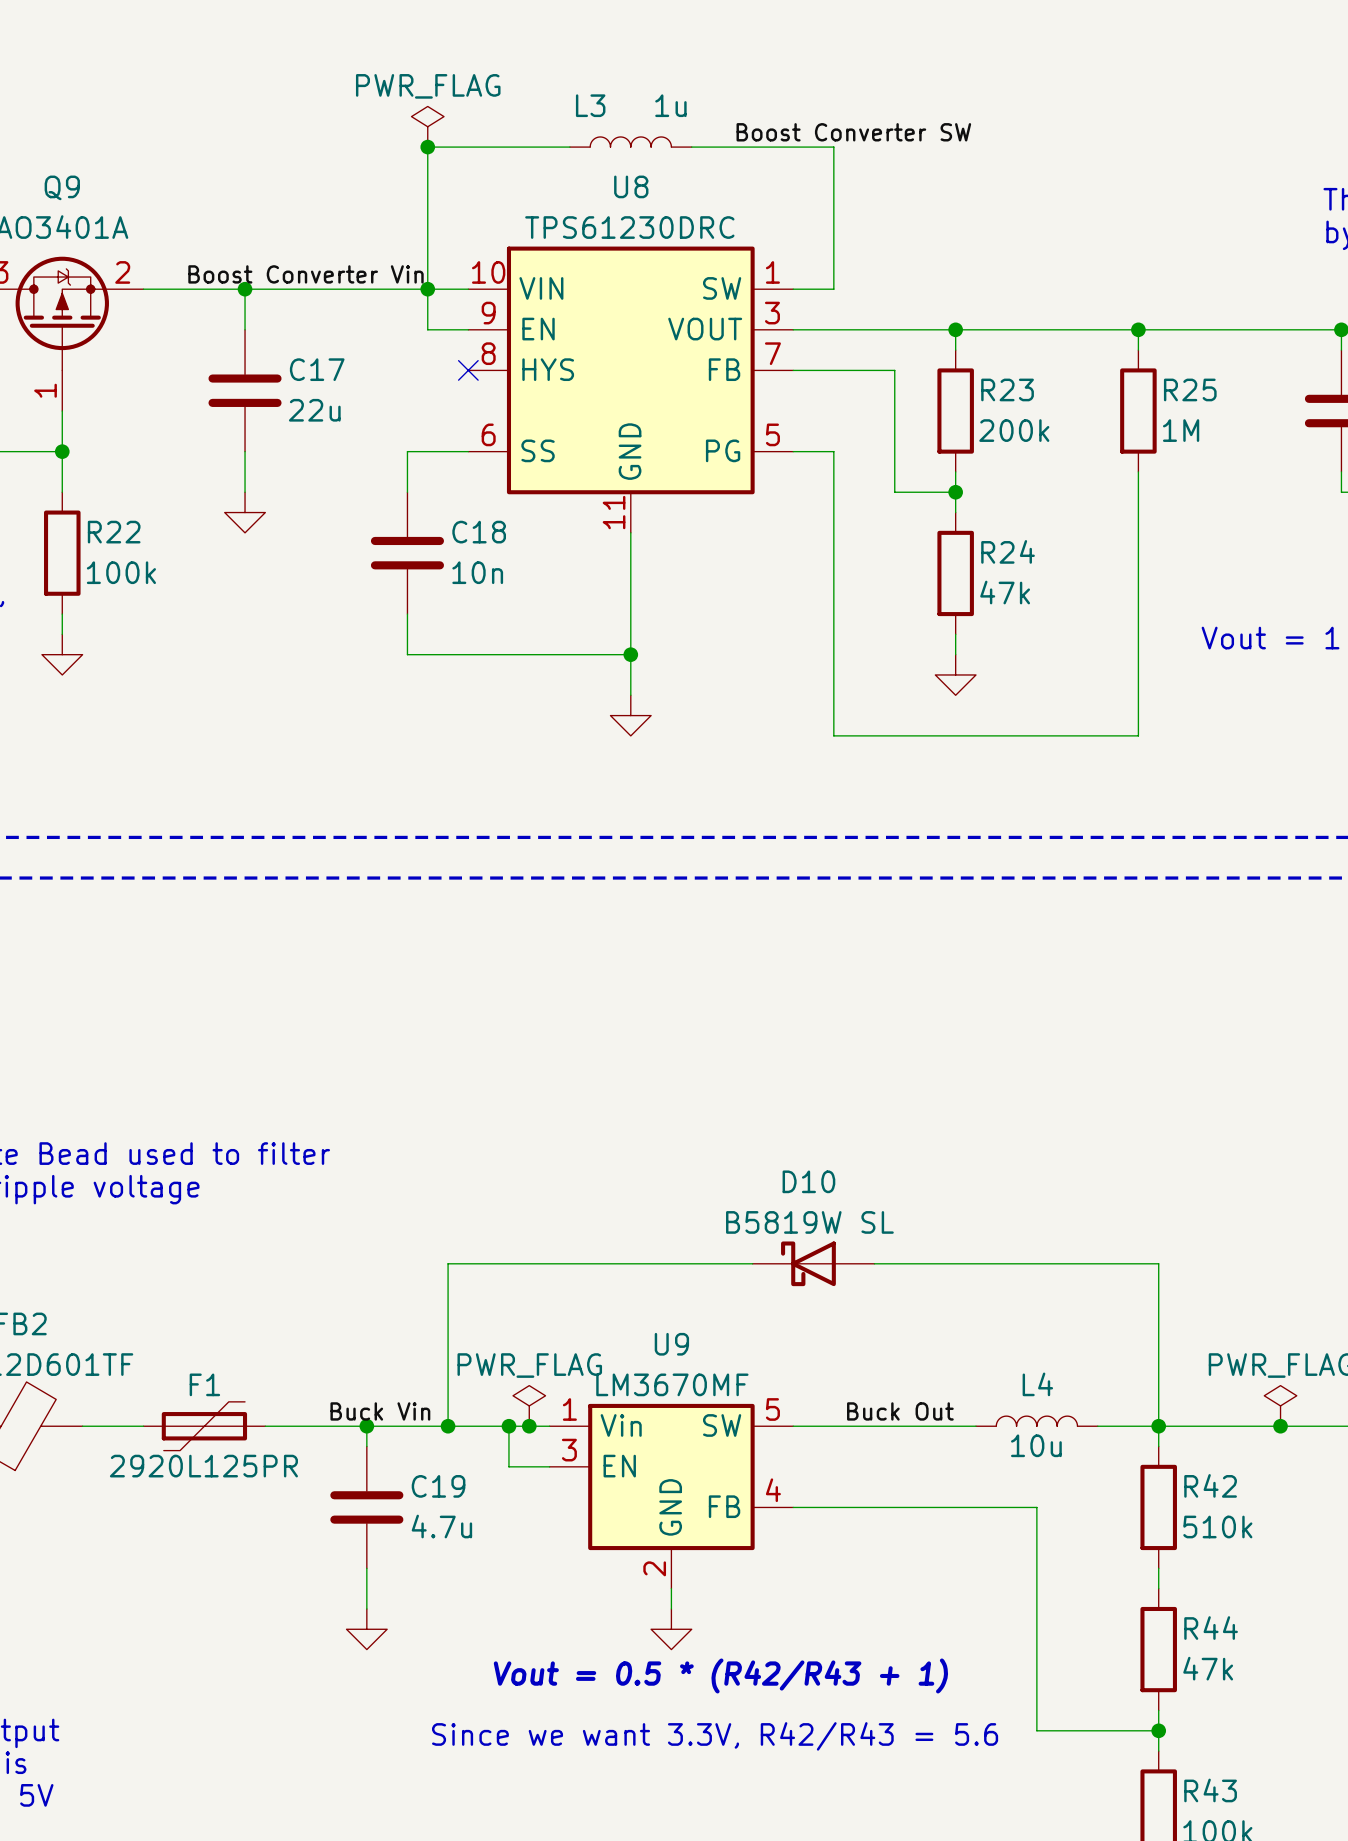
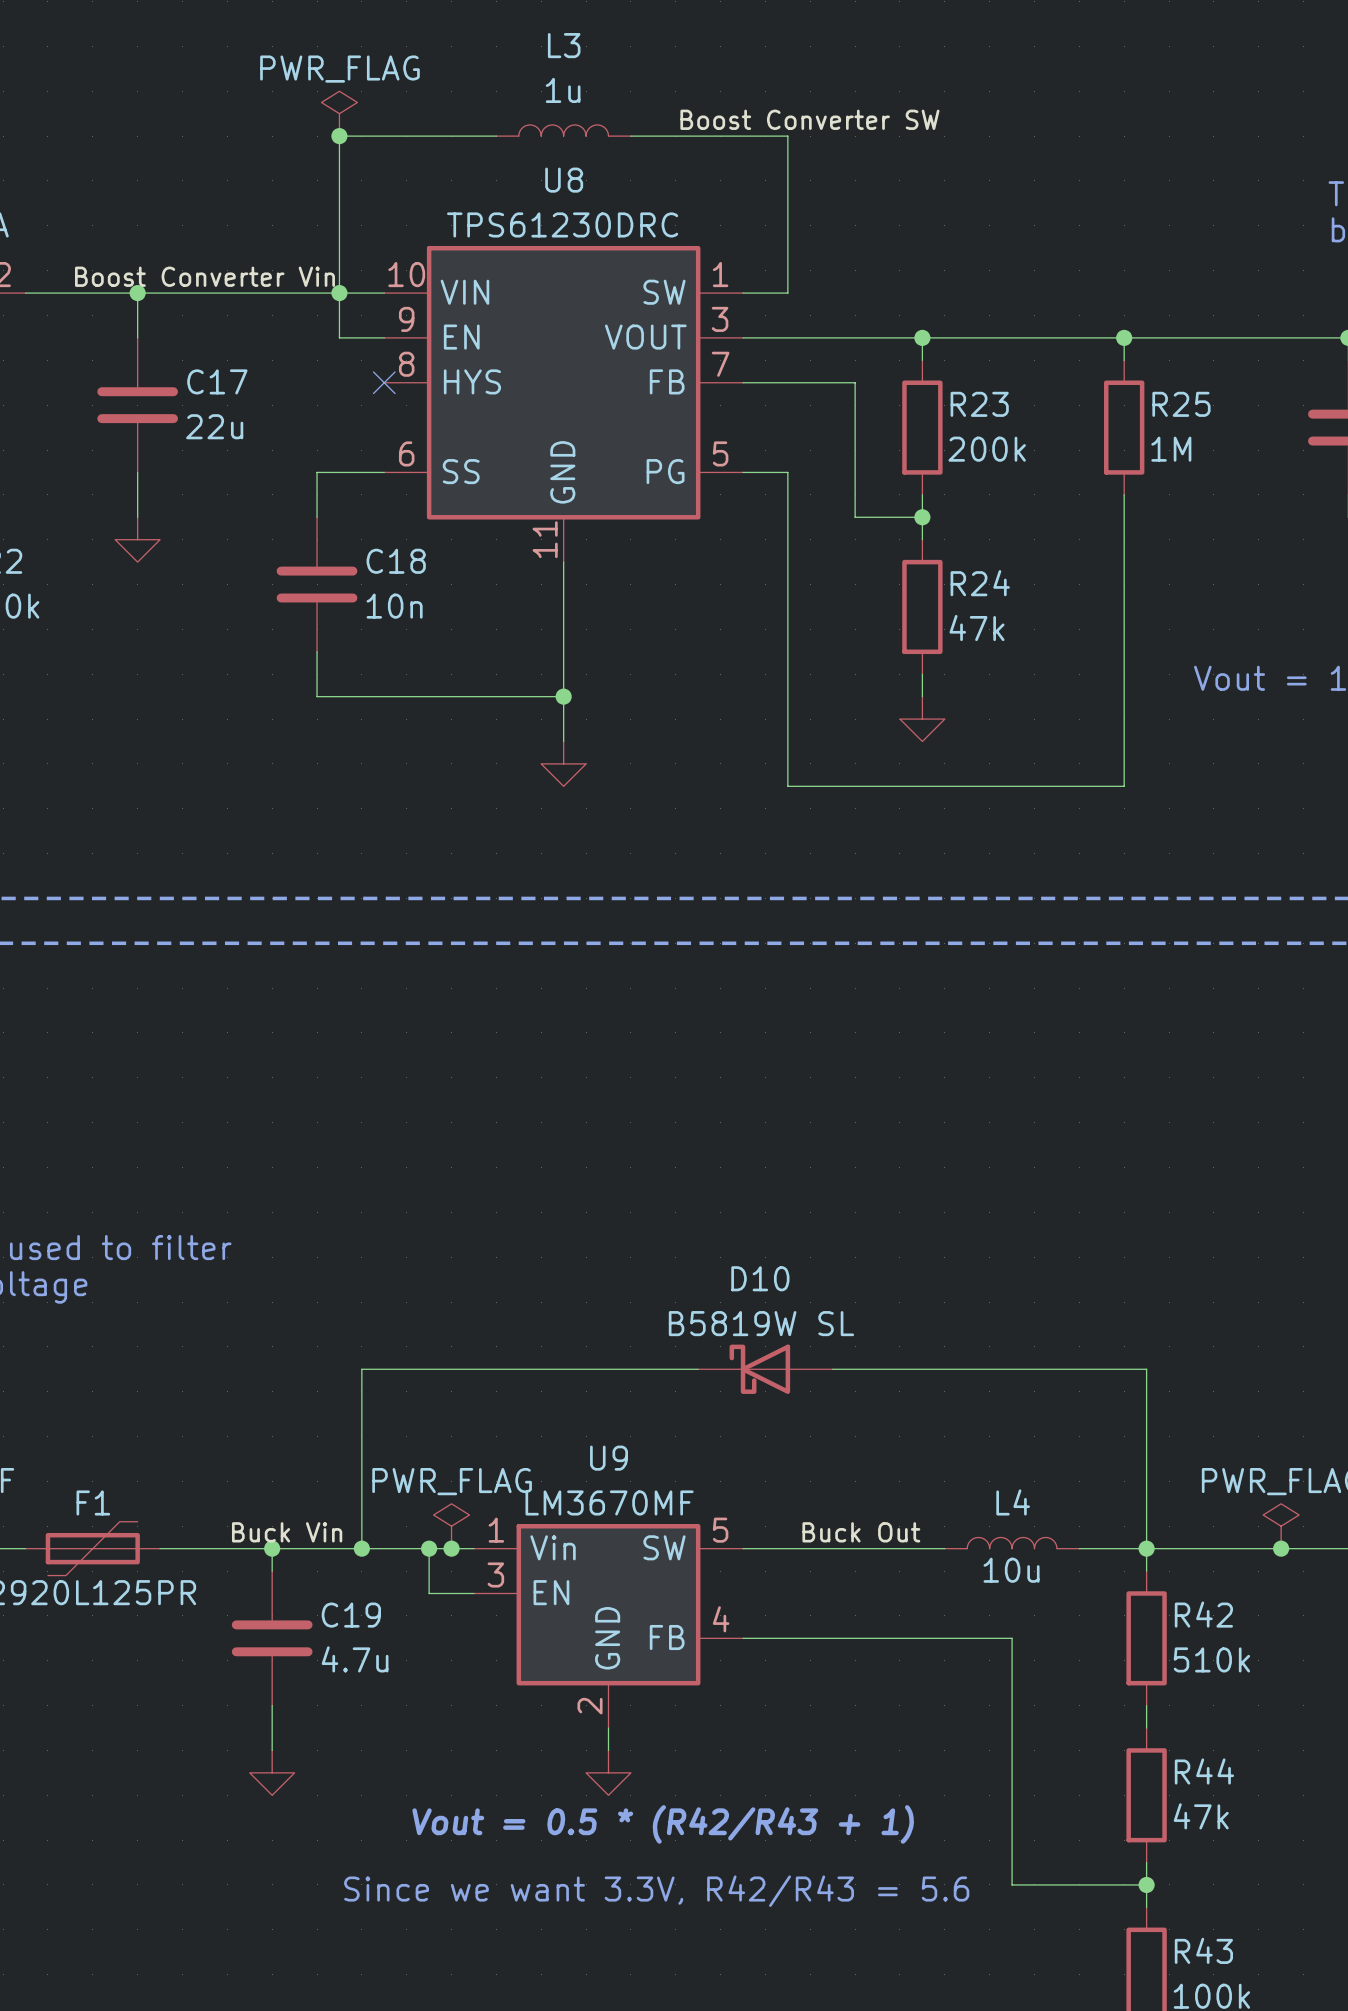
L3 name position: L3 (590, 105) -> L3 (564, 45)
L3 value position: 1u (670, 105) -> 1u (563, 90)

